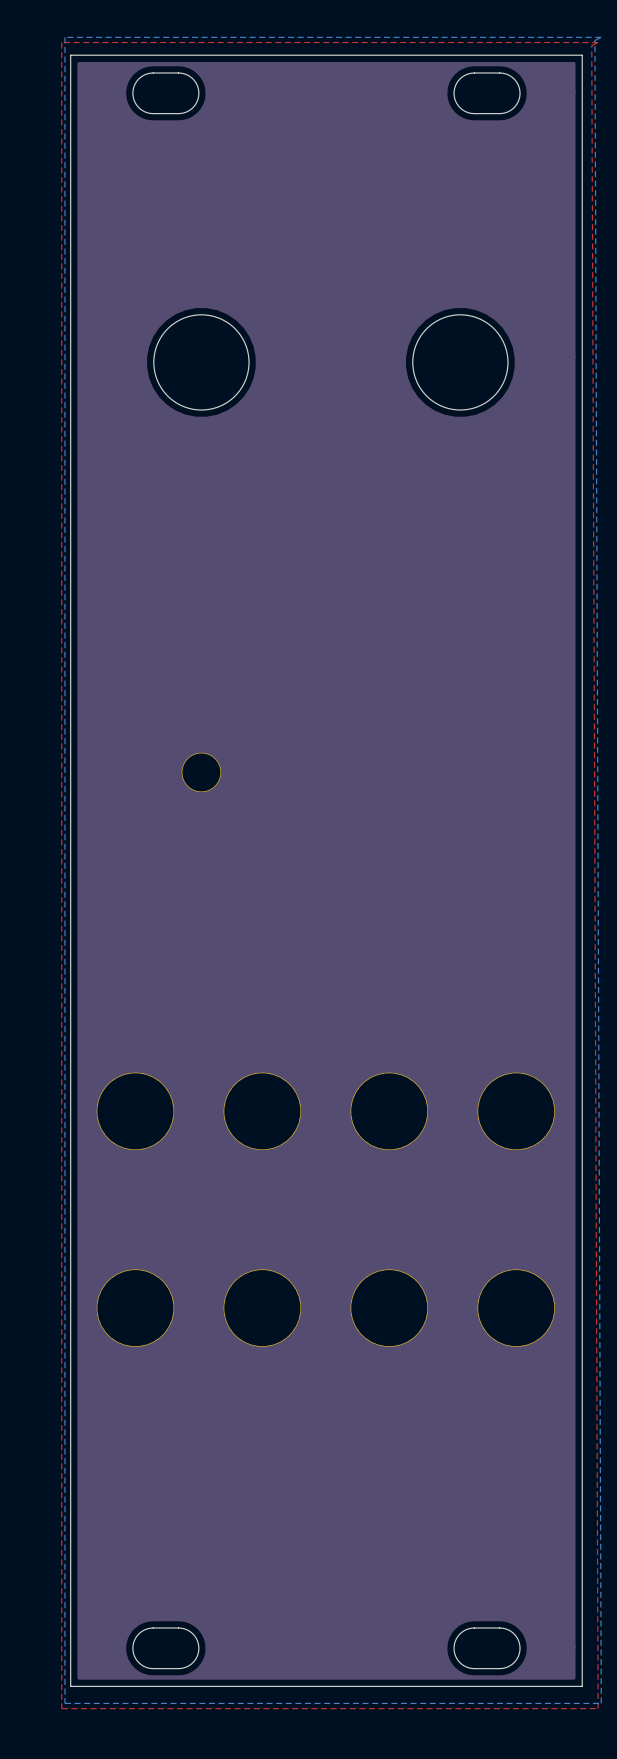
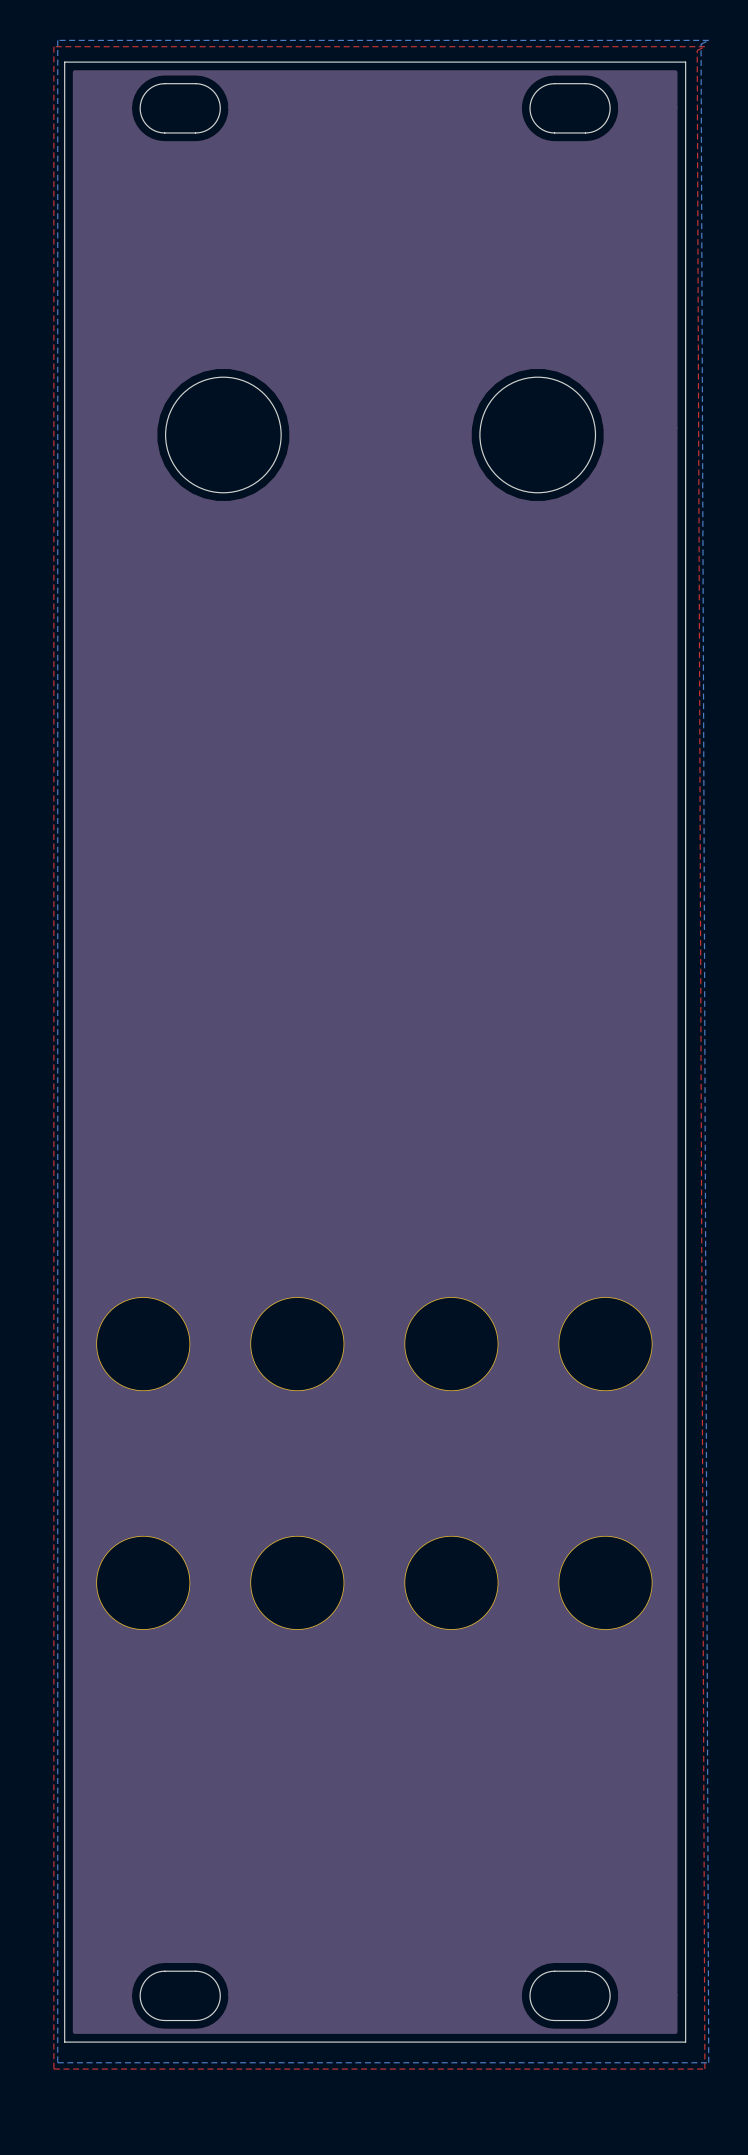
part: (201, 772) -> none

